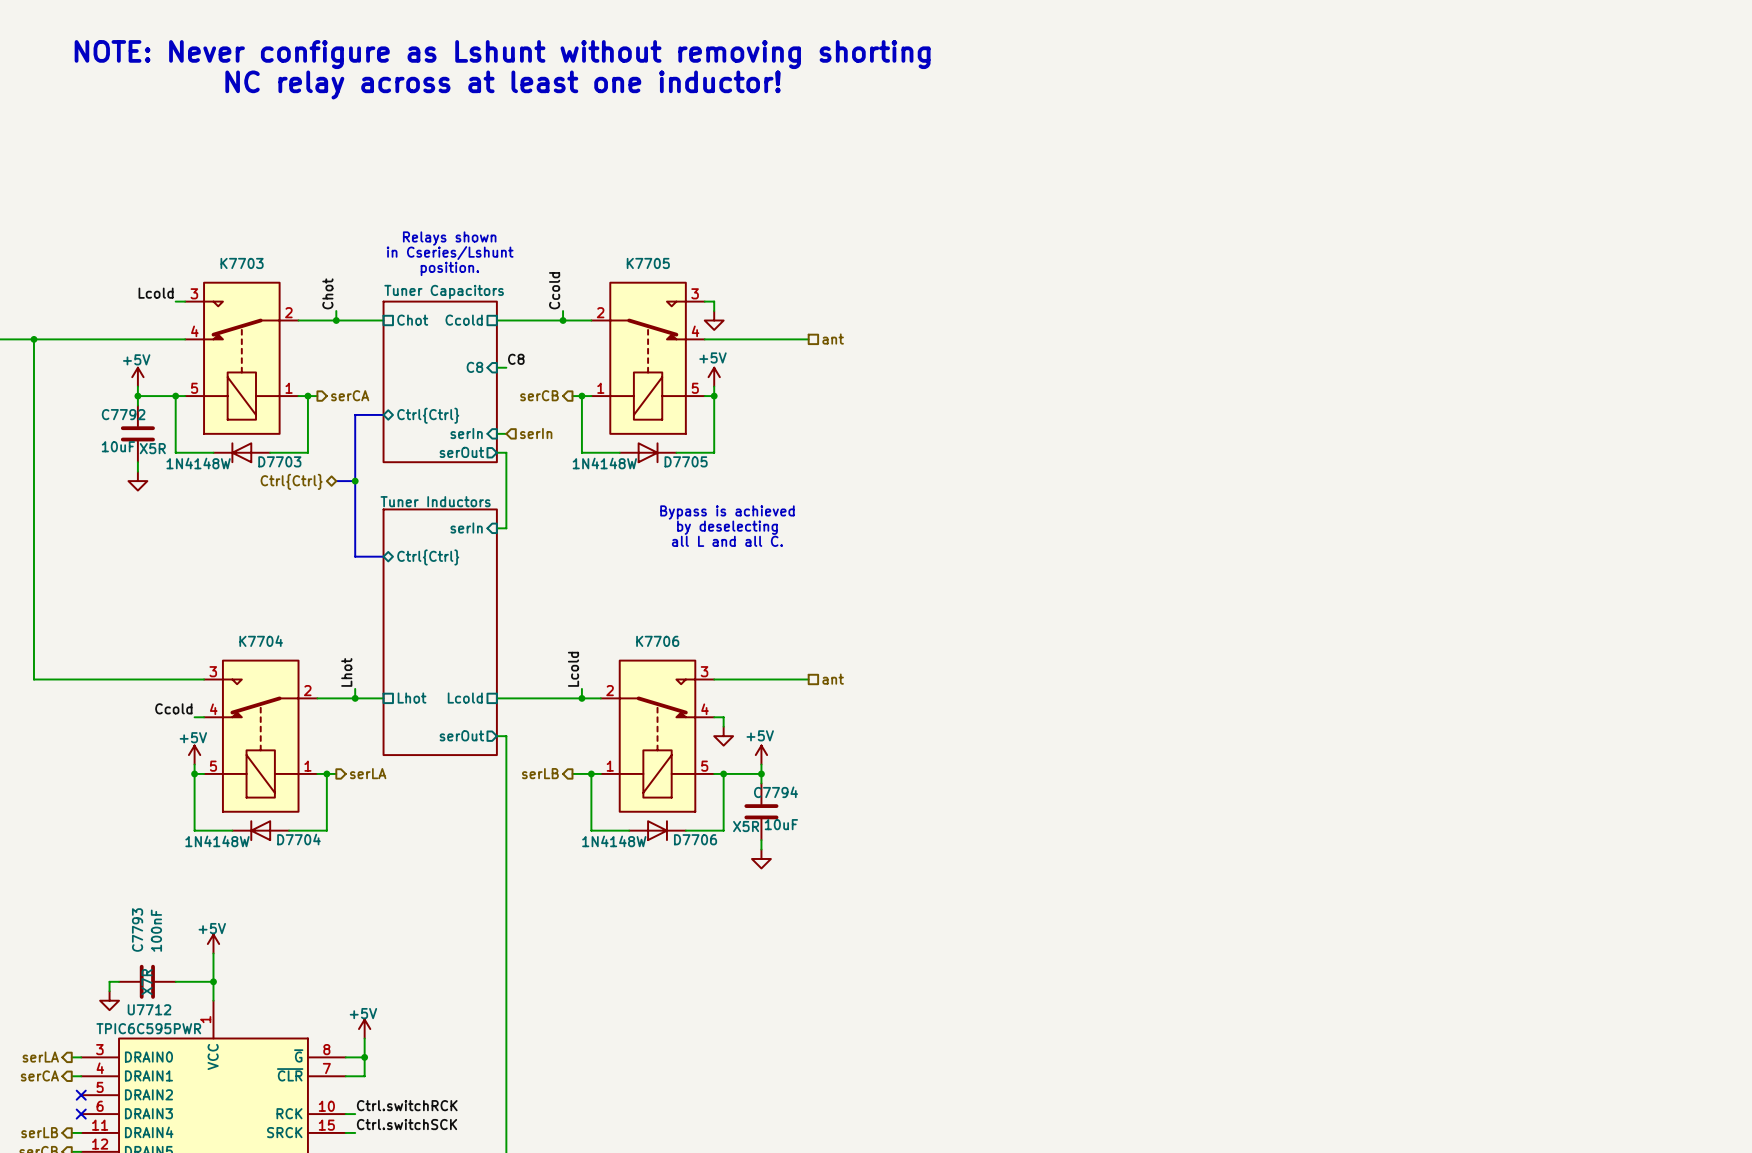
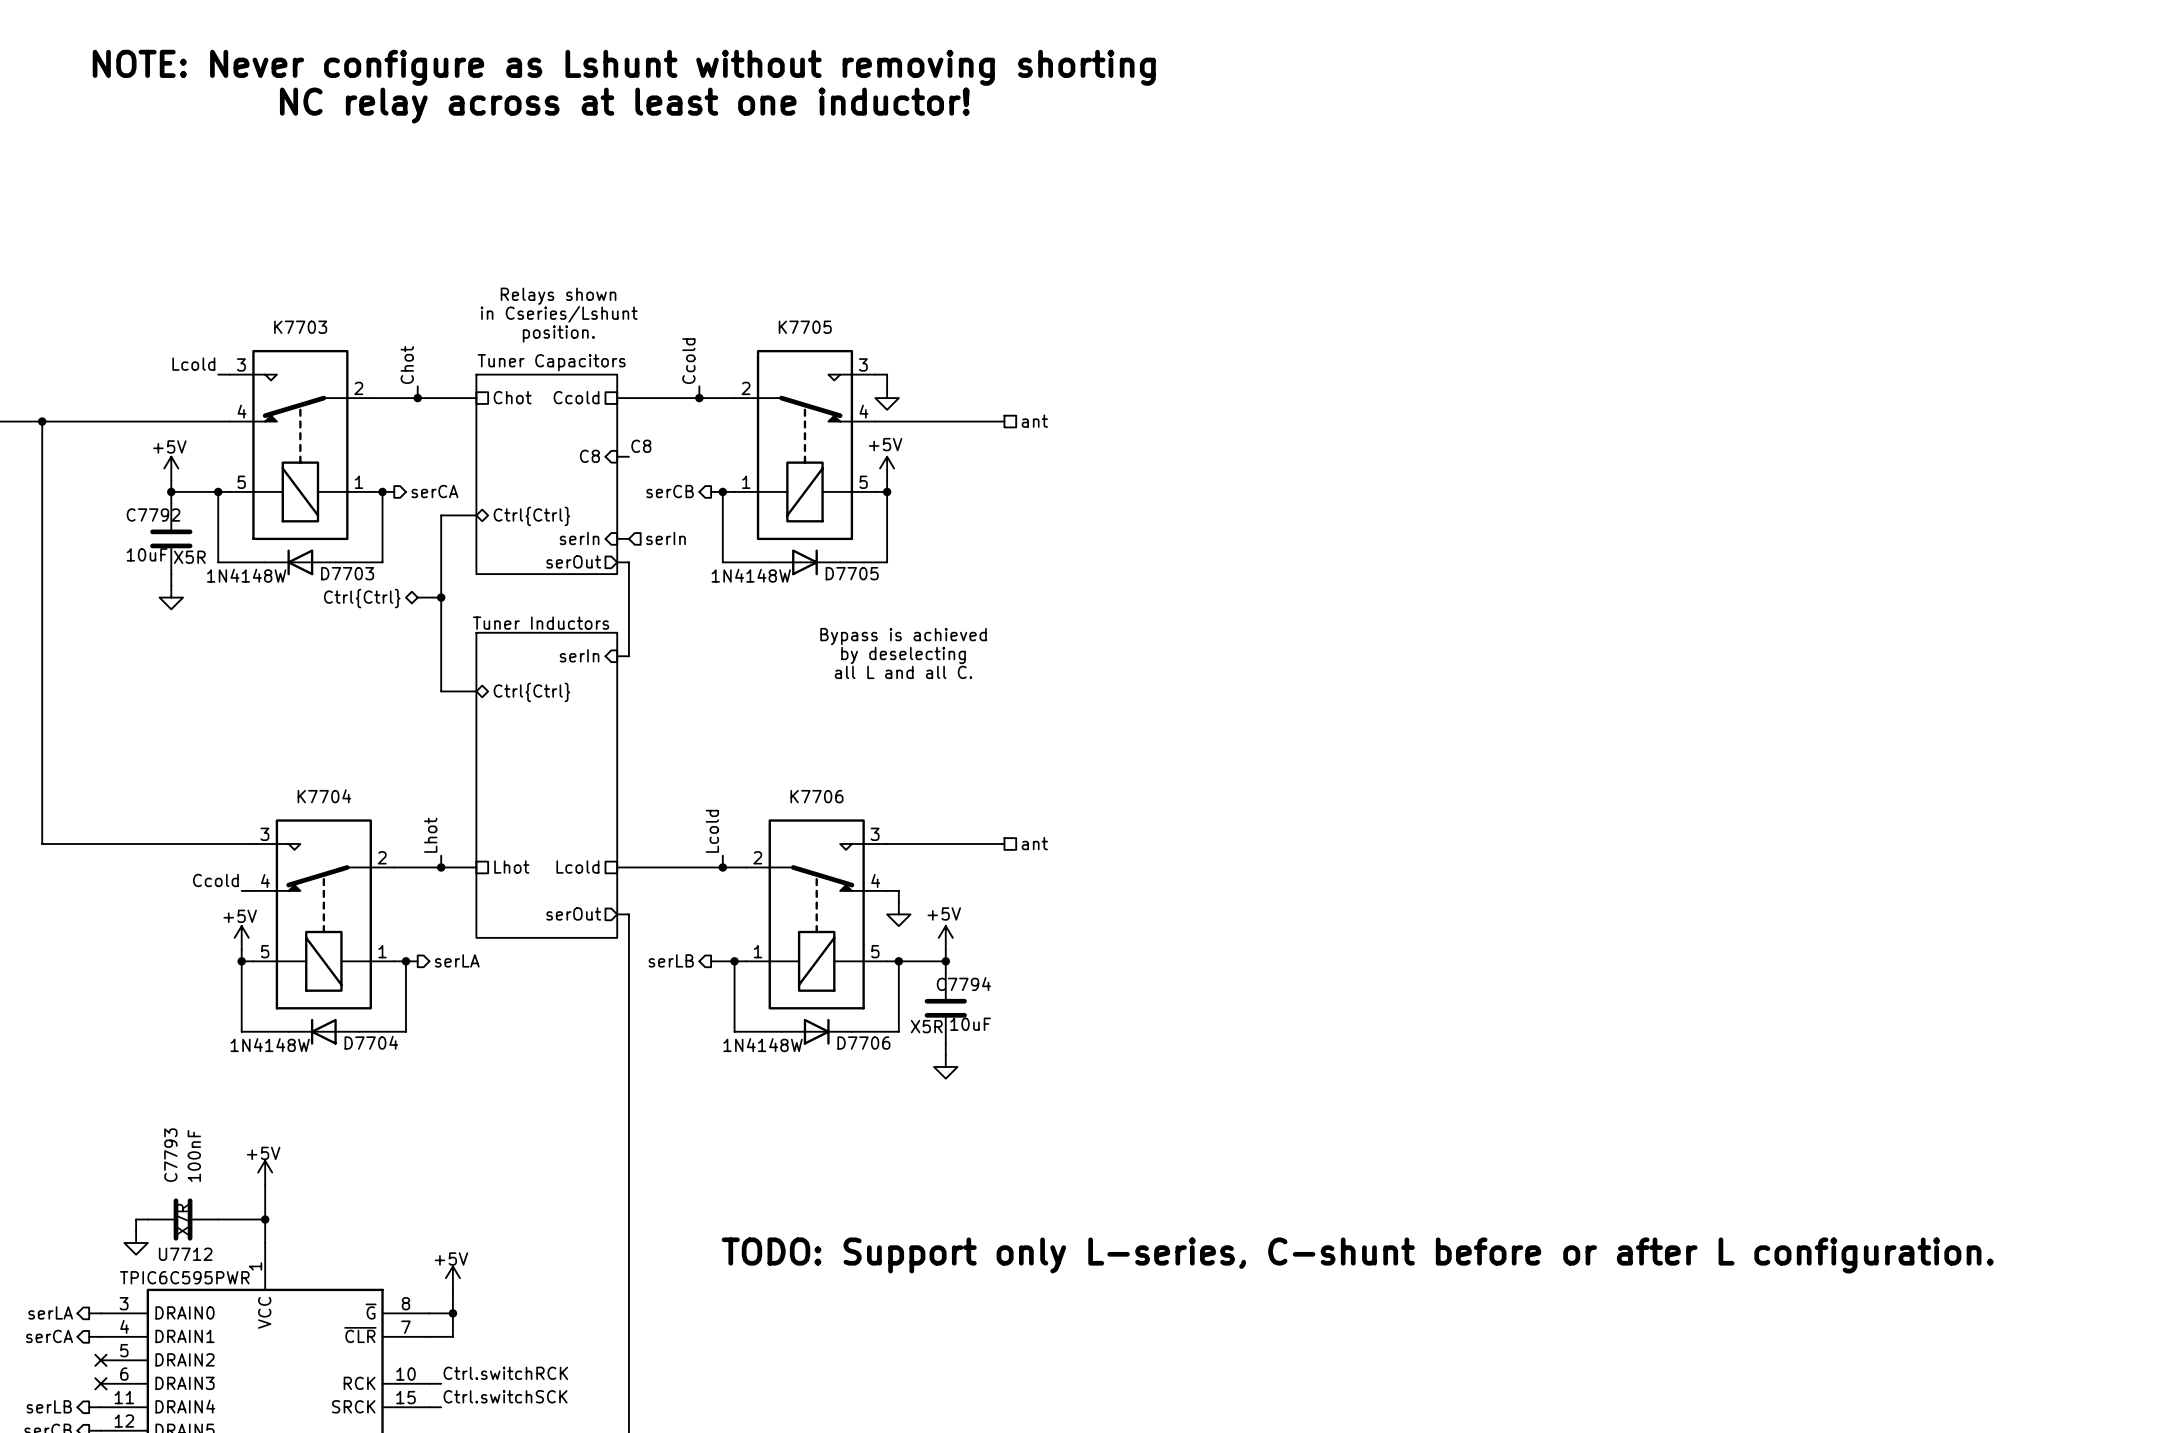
text: none -> TODO: Support only L-series, C-shunt before or after L configuration. (1357, 1255)

